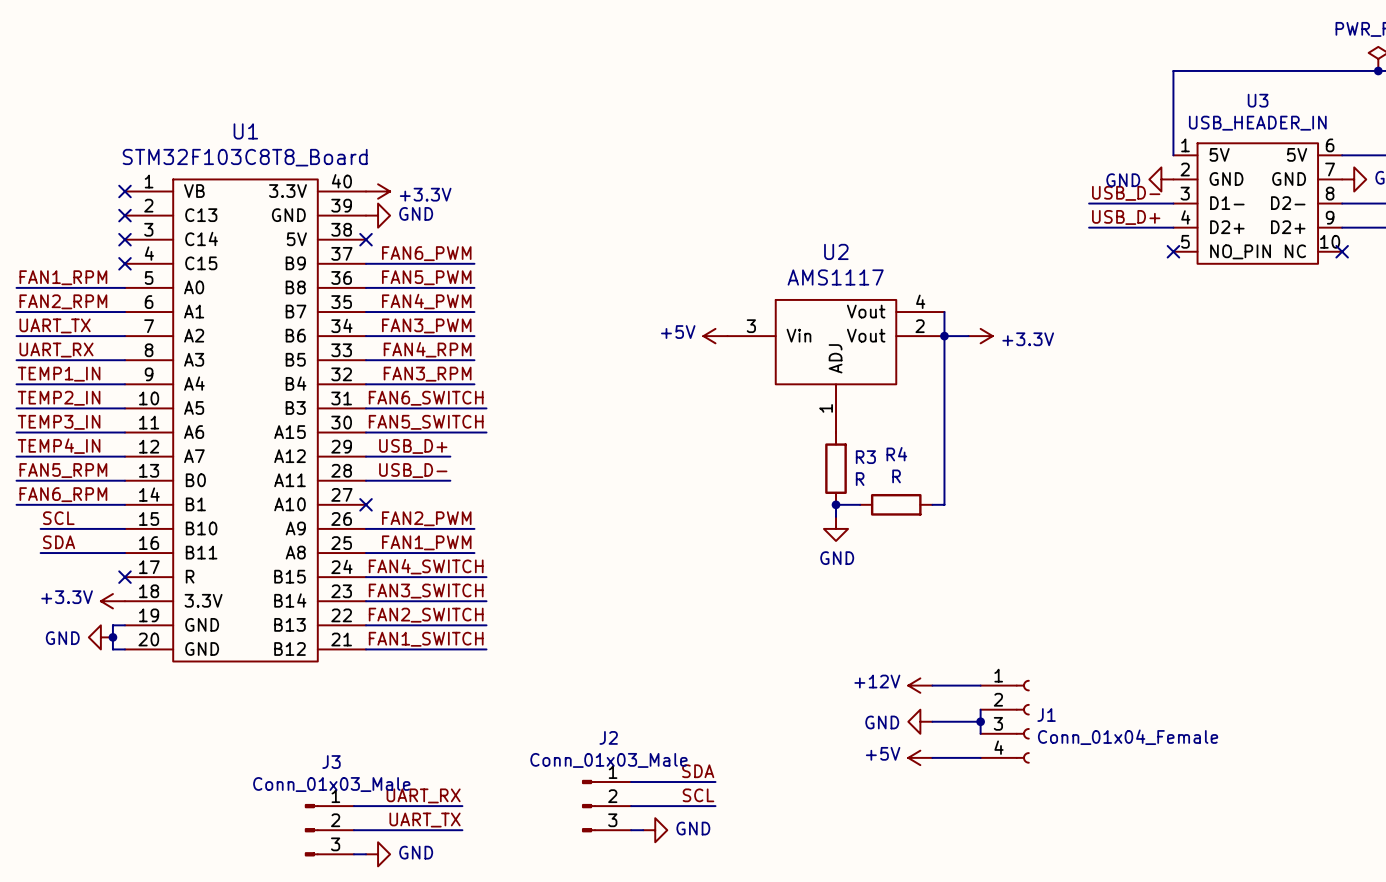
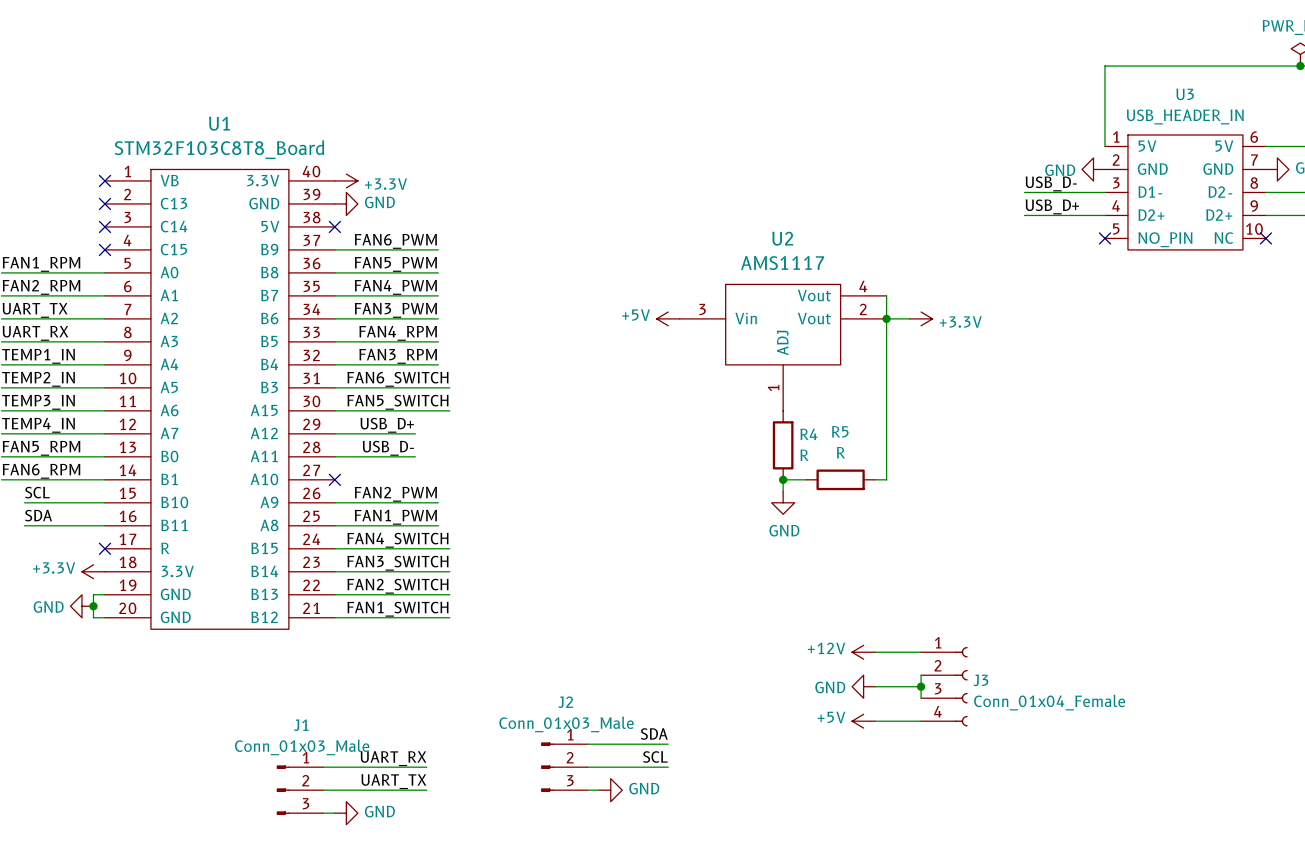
R4 name: R4 (896, 454) -> R5 (840, 431)
R3 name: R3 (865, 457) -> R4 (808, 434)
J1 name: J1 (1046, 715) -> J3 (980, 680)
J3 name: J3 (331, 762) -> J1 (301, 725)

